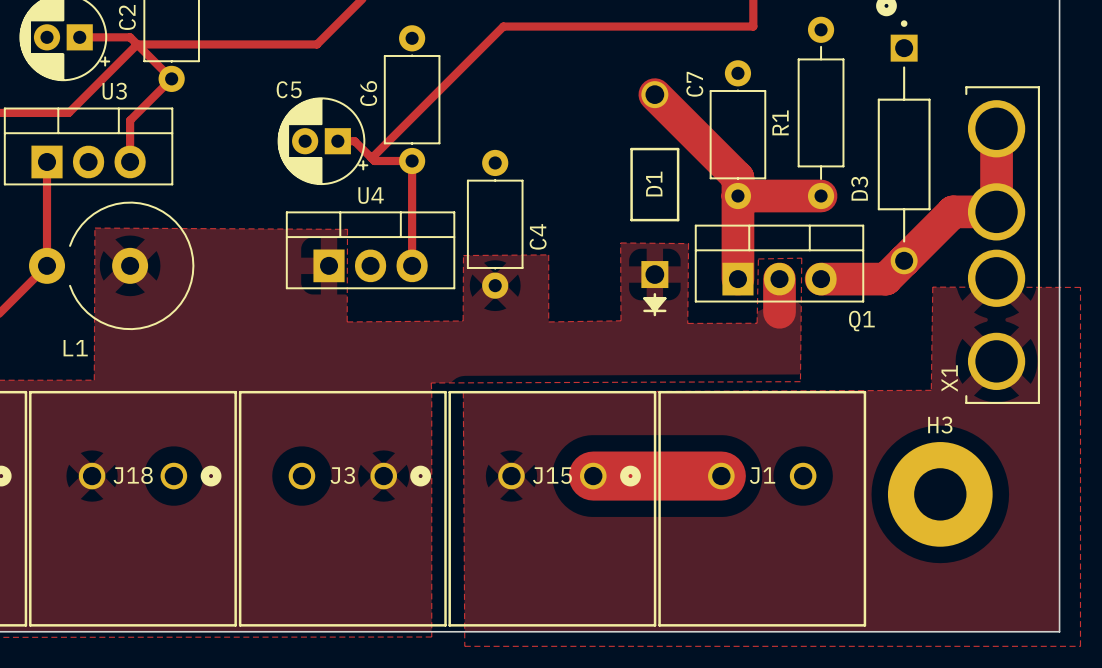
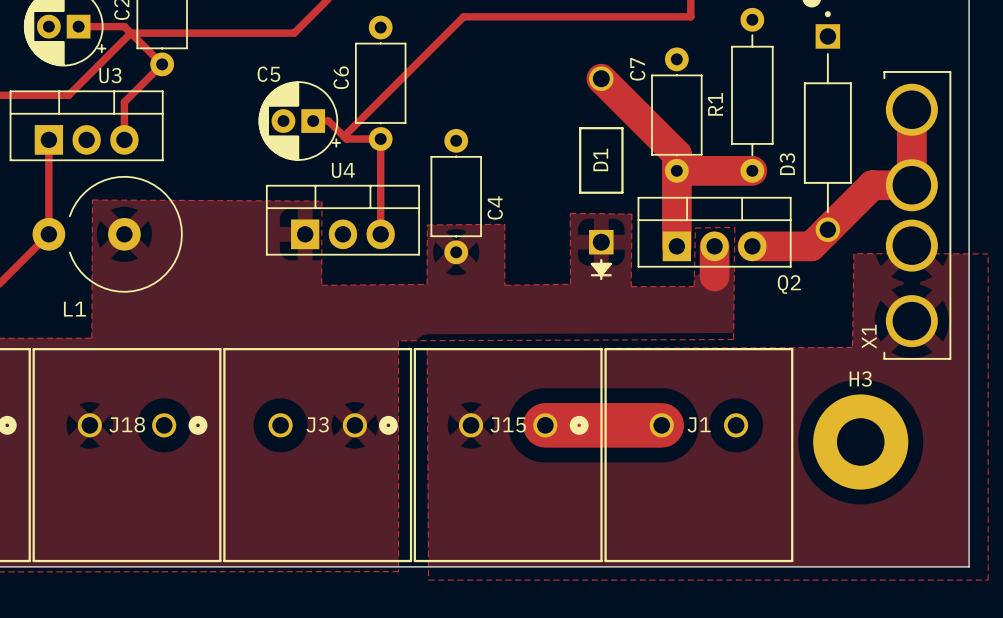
Q1 name: Q1 (861, 321) -> Q2 (789, 284)

